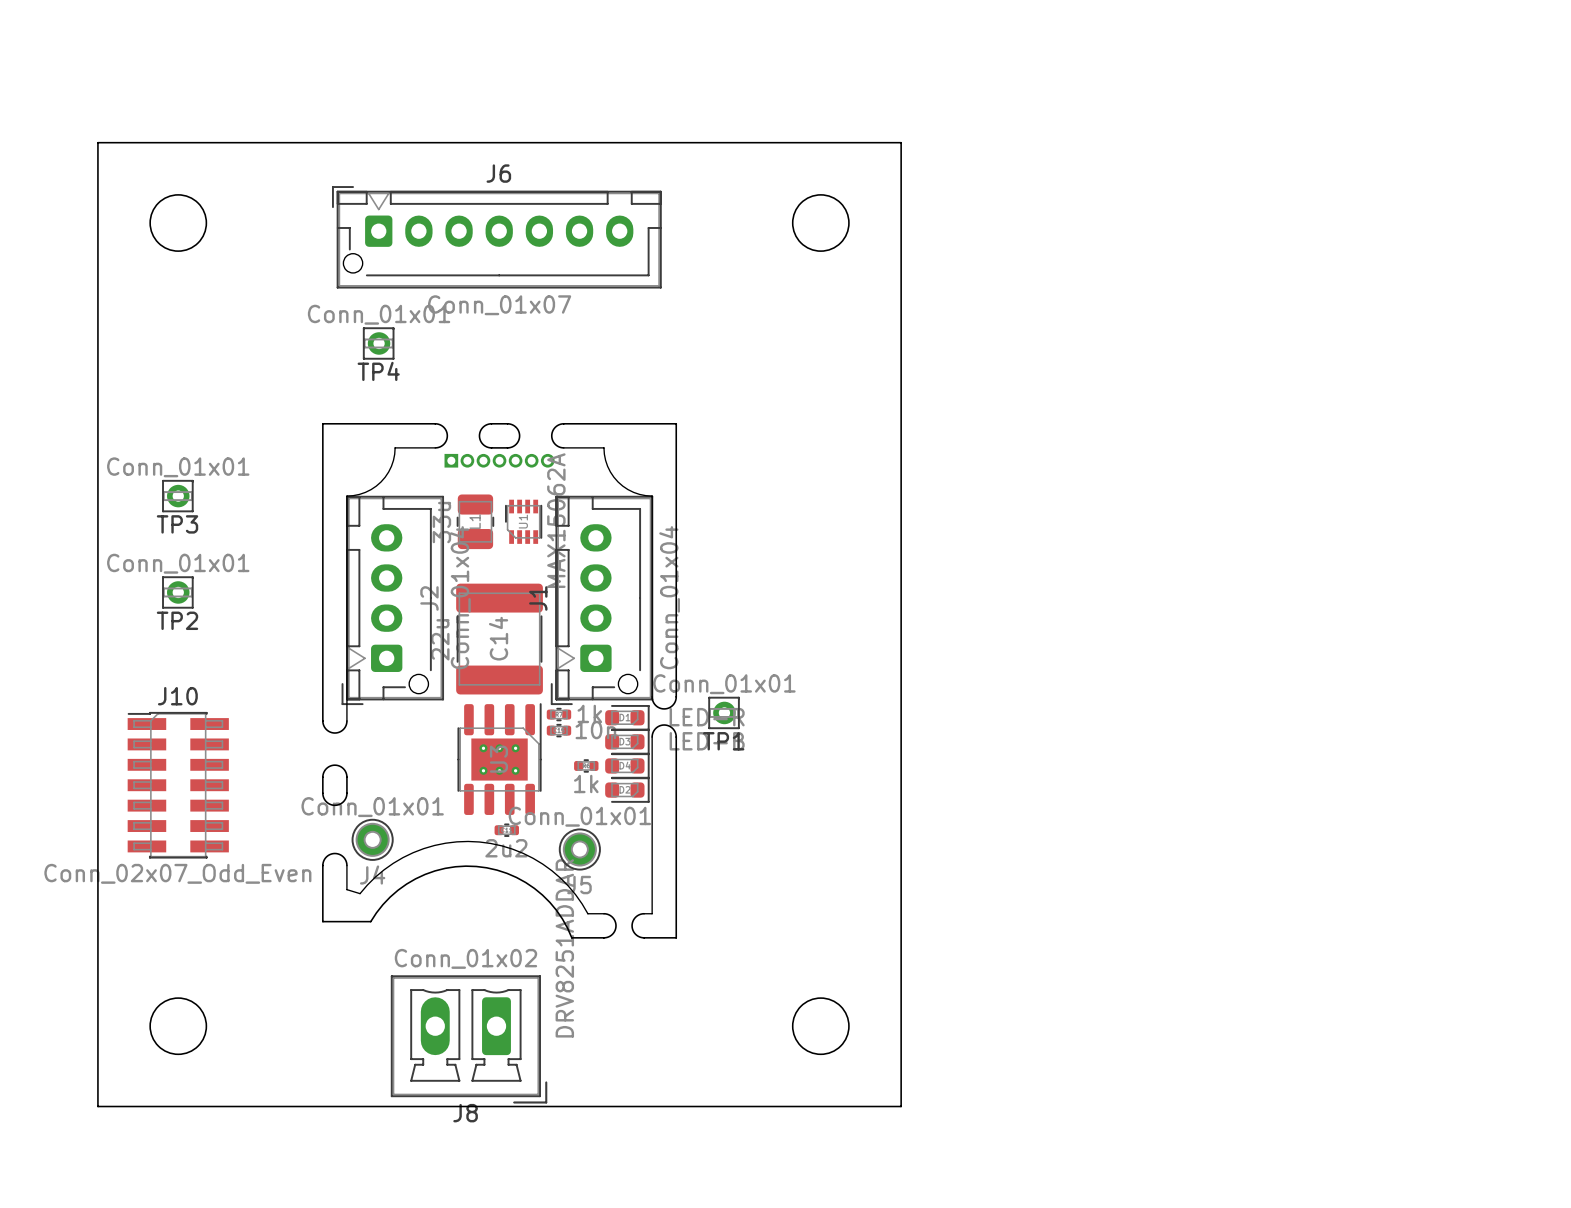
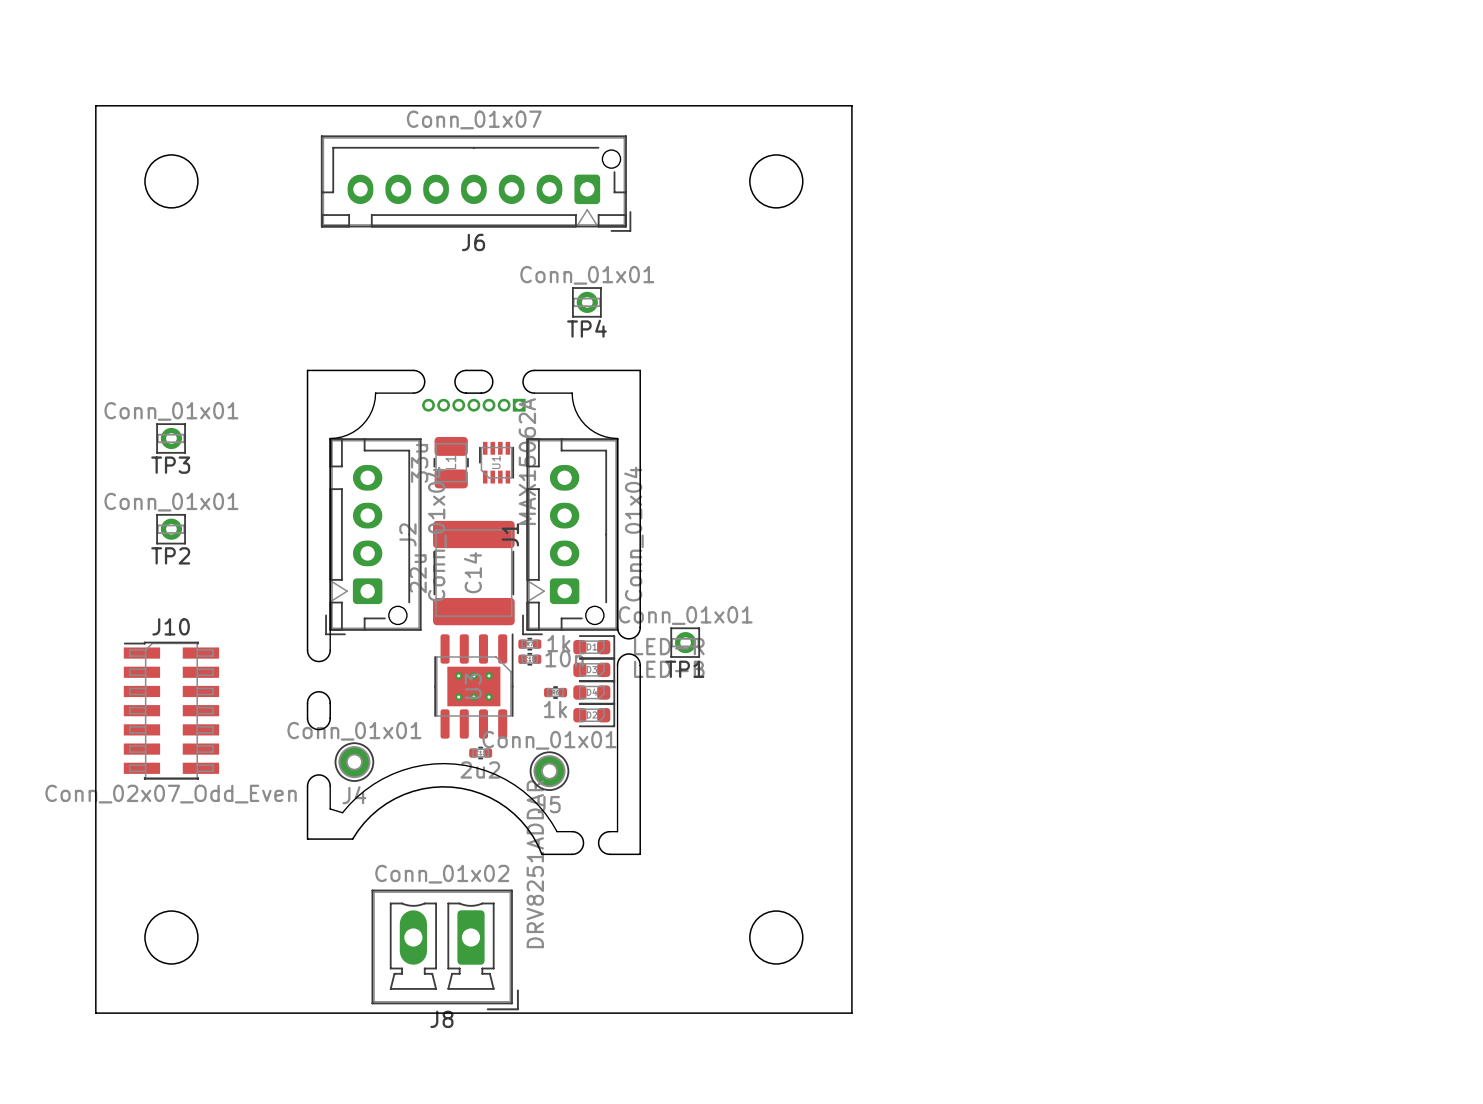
J6 rotation: 0° (496, 237) -> 180° (476, 183)
TP4 position: (378, 343) -> (586, 302)
part rotation: 0° (499, 460) -> 180° (473, 405)

